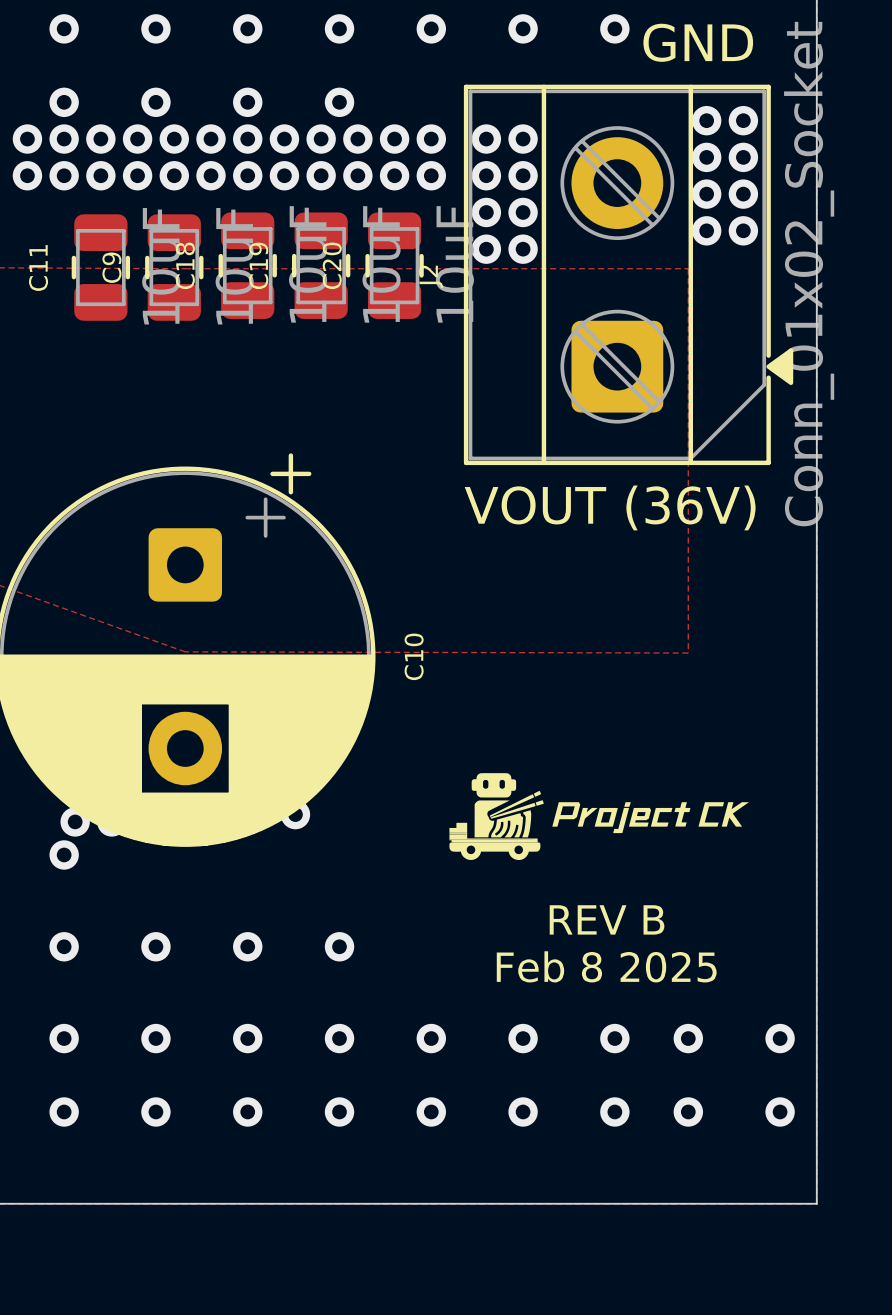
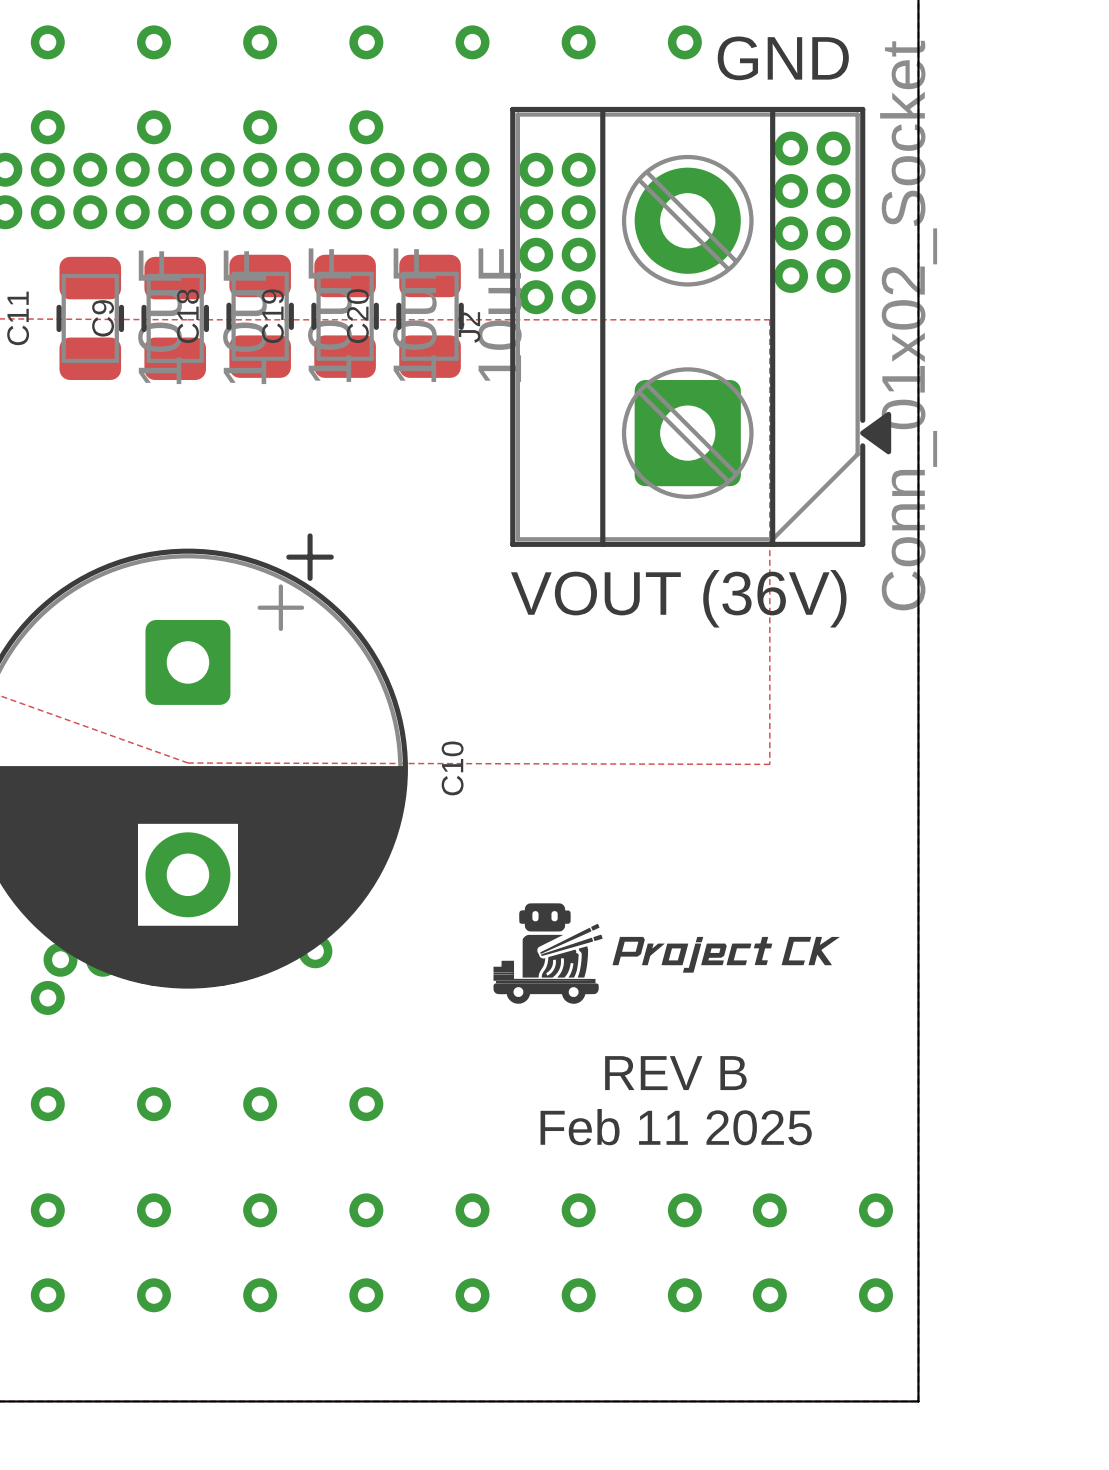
text: Feb 8 2025 (606, 966) -> Feb 11 2025 (676, 1127)

